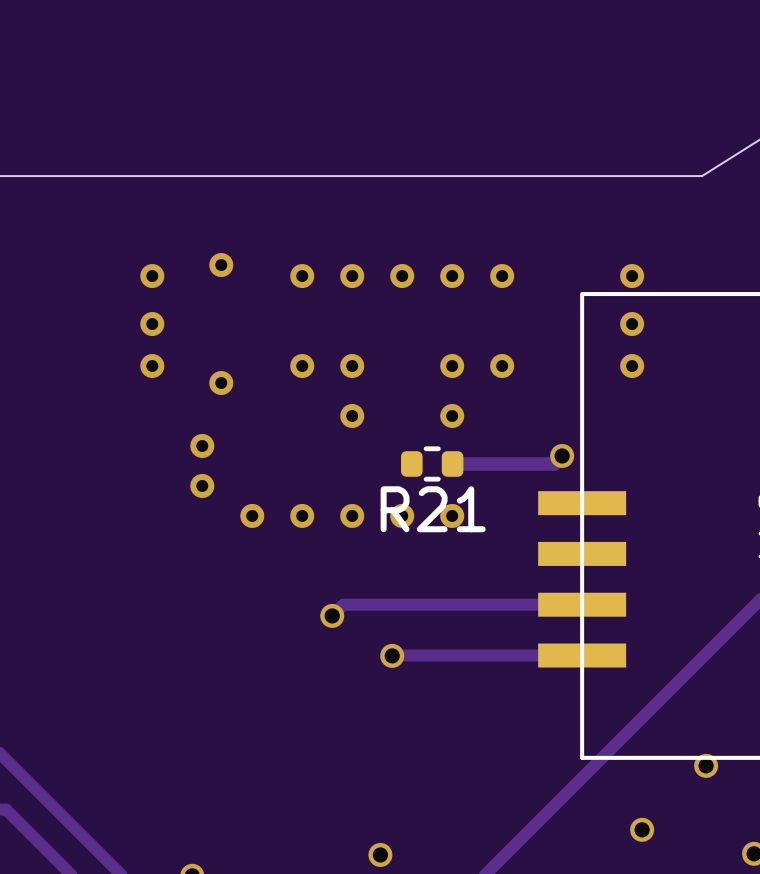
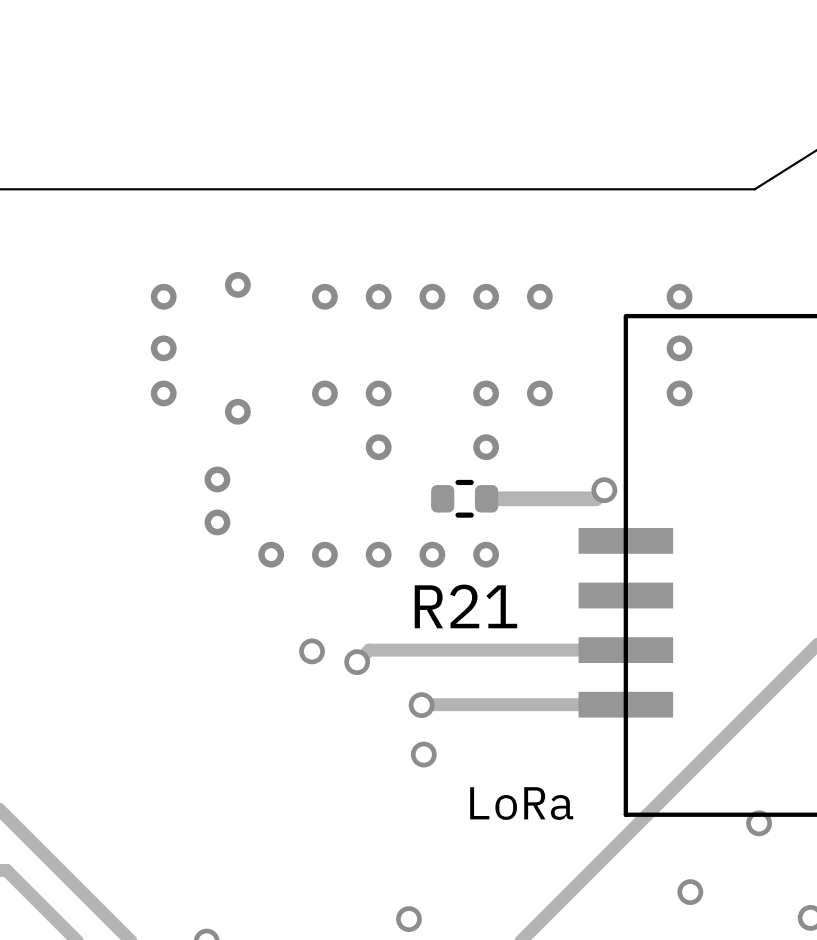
R21 name position: R21 (433, 509) -> R21 (465, 606)
via: none -> (312, 651)
via: none -> (423, 754)
text: none -> LoRa (521, 803)

